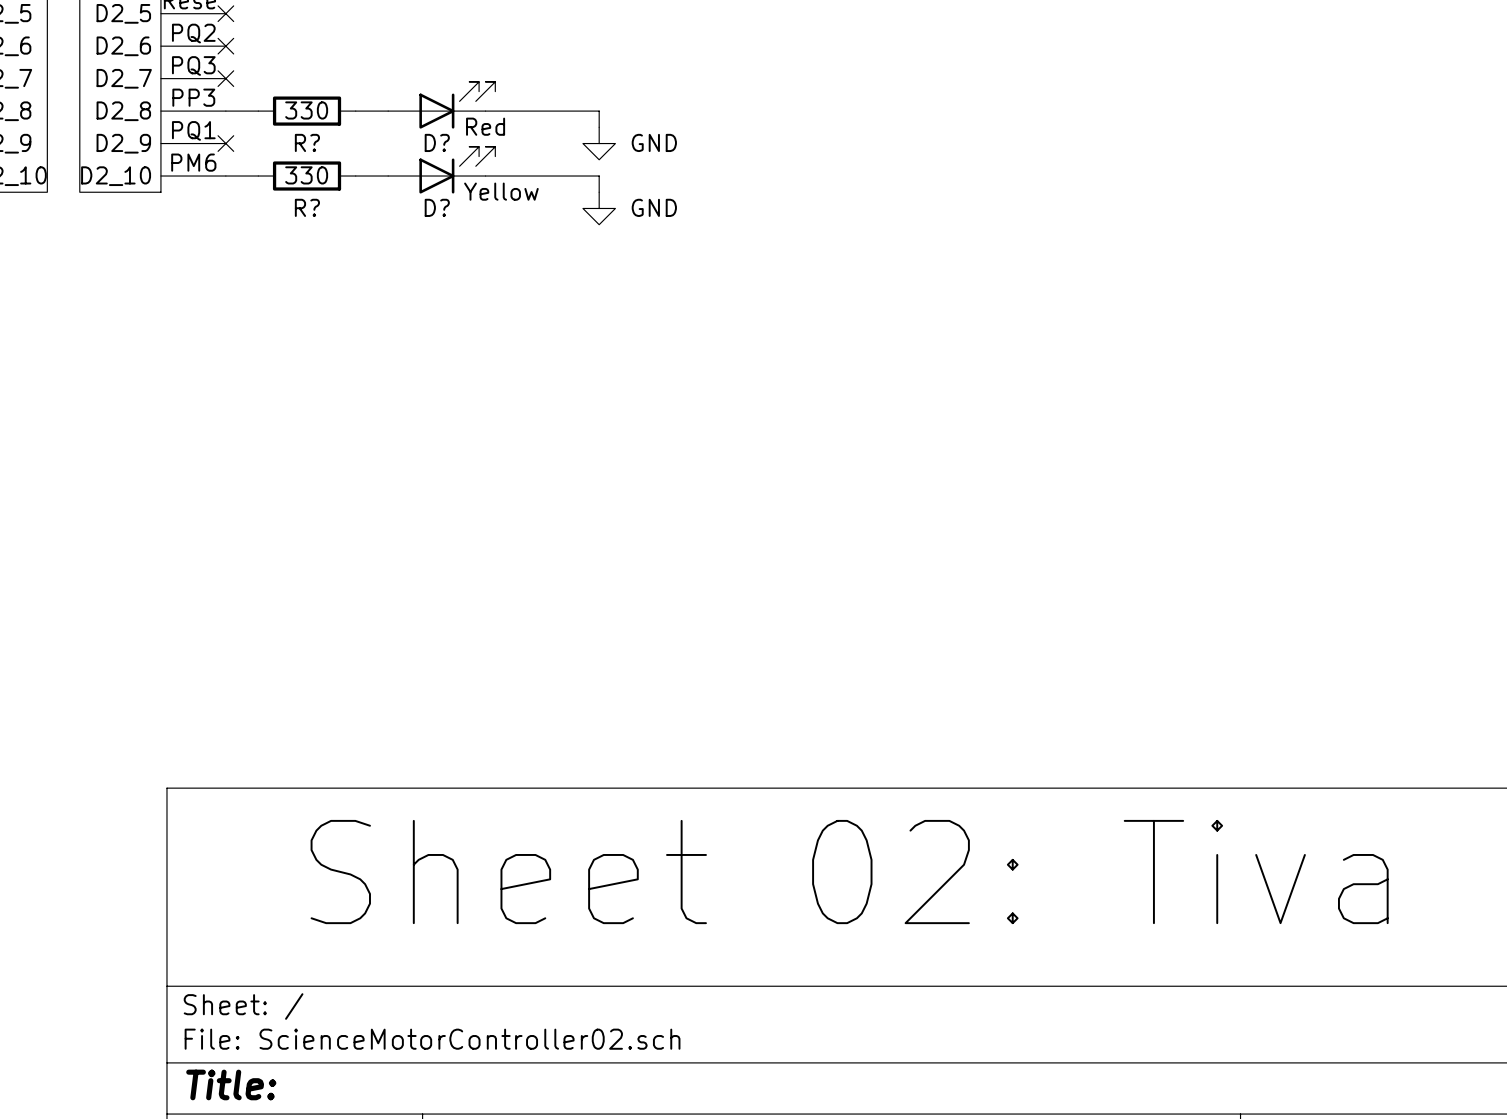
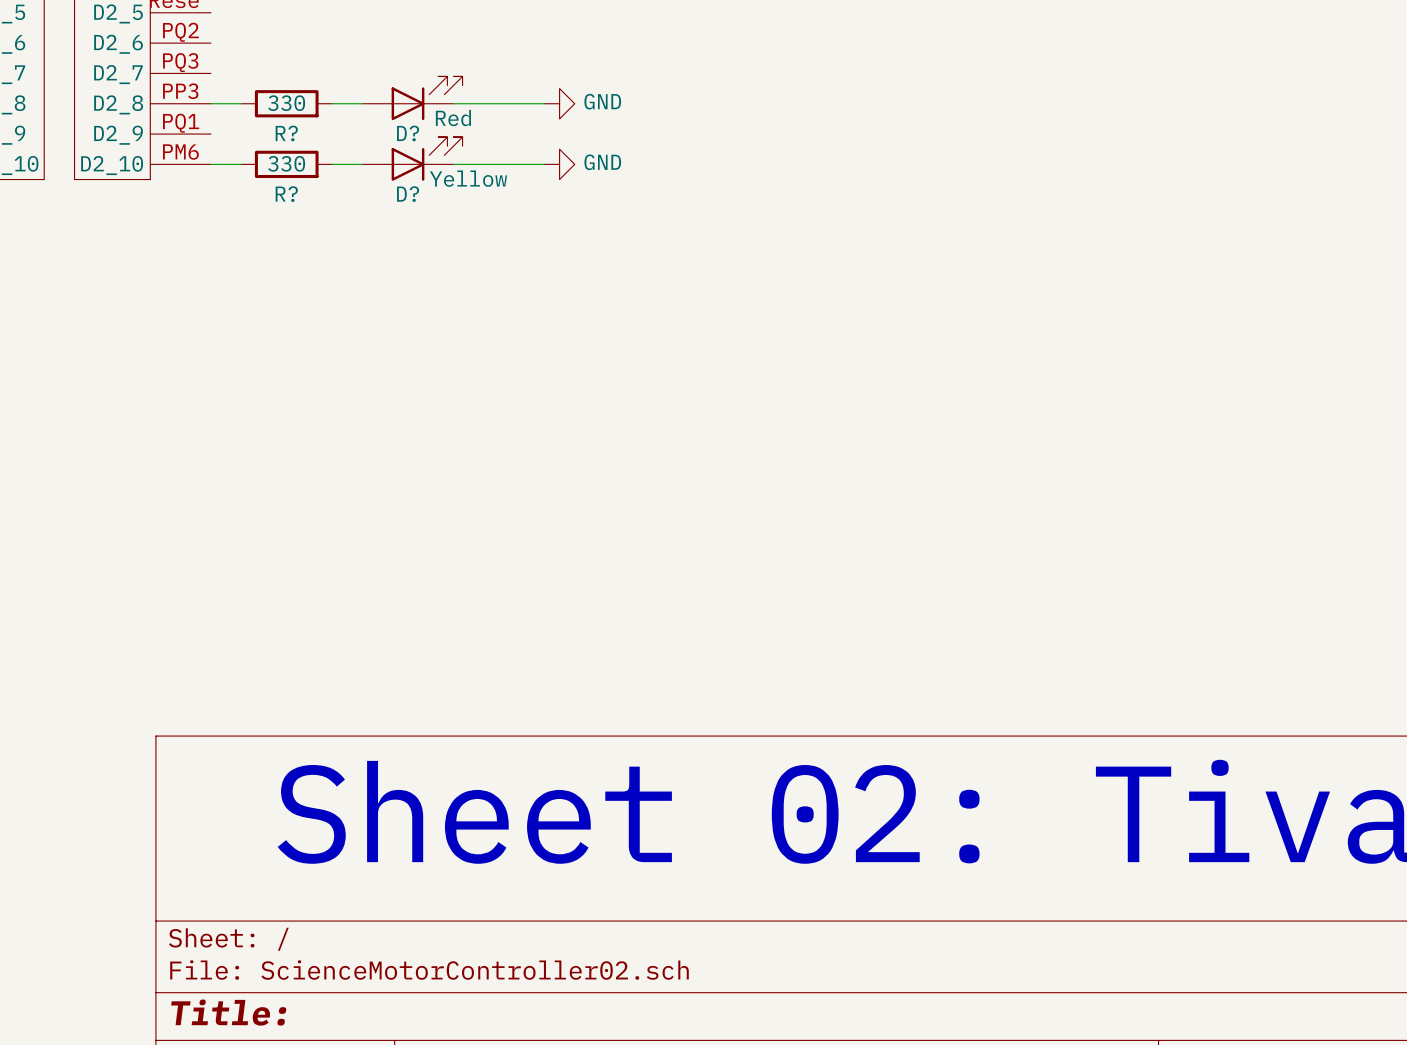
no-connect mark: (225, 13) -> none
no-connect mark: (225, 46) -> none
no-connect mark: (225, 78) -> none
power symbol: none -> GND (559, 103)
no-connect mark: (225, 143) -> none
power symbol: GND (599, 143) -> none
power symbol: none -> GND (559, 164)
power symbol: GND (599, 208) -> none

